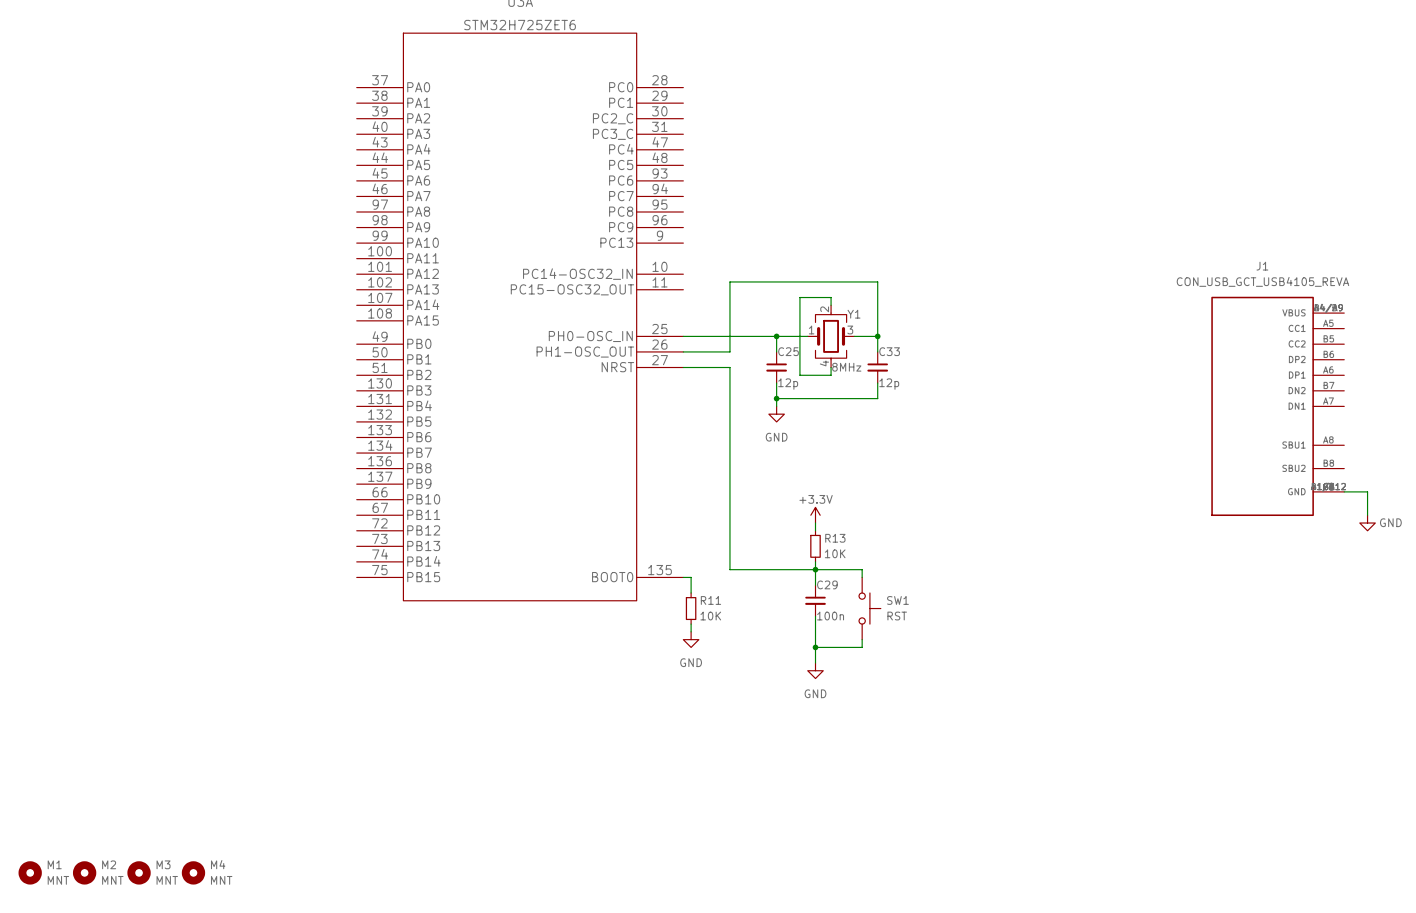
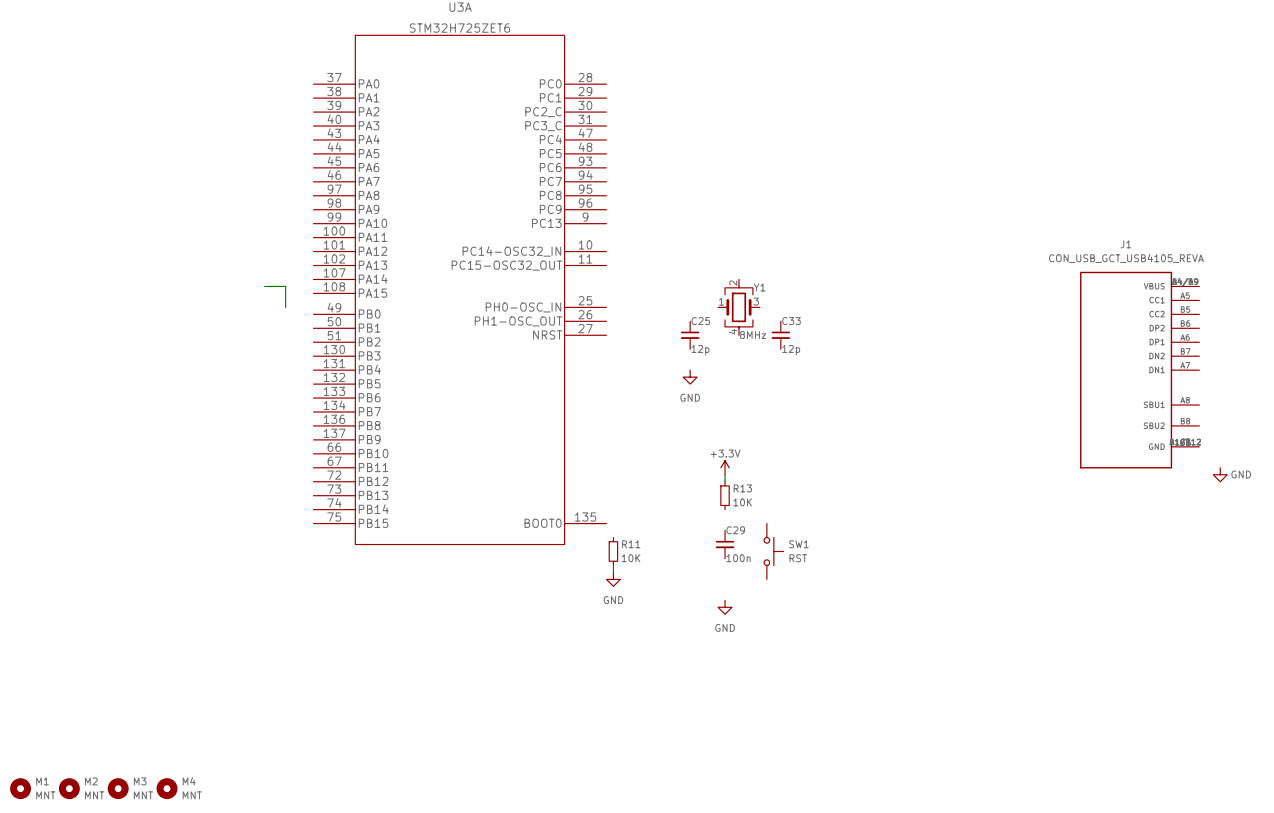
wire: (831, 305) (831, 297) (799, 297) (799, 375) (831, 375) (831, 367) -> none
wire: none -> (264, 286) (285, 286) (285, 307)
wire: (683, 336) (807, 336) -> none
wire: (776, 336) (776, 351) -> none
junction: (776, 336) -> none
wire: (854, 336) (877, 336) -> none
junction: (877, 336) -> none
wire: (683, 351) (729, 351) (729, 281) (877, 281) (877, 351) -> none
wire: (683, 367) (729, 367) (729, 569) (862, 569) (862, 577) -> none
wire: (776, 383) (776, 406) -> none
wire: (877, 383) (877, 398) (776, 398) -> none
junction: (776, 398) -> none
wire: (1344, 491) (1367, 491) (1367, 515) -> none
wire: (815, 561) (815, 585) -> none
junction: (815, 569) -> none
wire: (683, 577) (691, 577) (691, 592) -> none
wire: (815, 616) (815, 662) -> none
wire: (862, 639) (862, 647) (815, 647) -> none
junction: (815, 647) -> none

